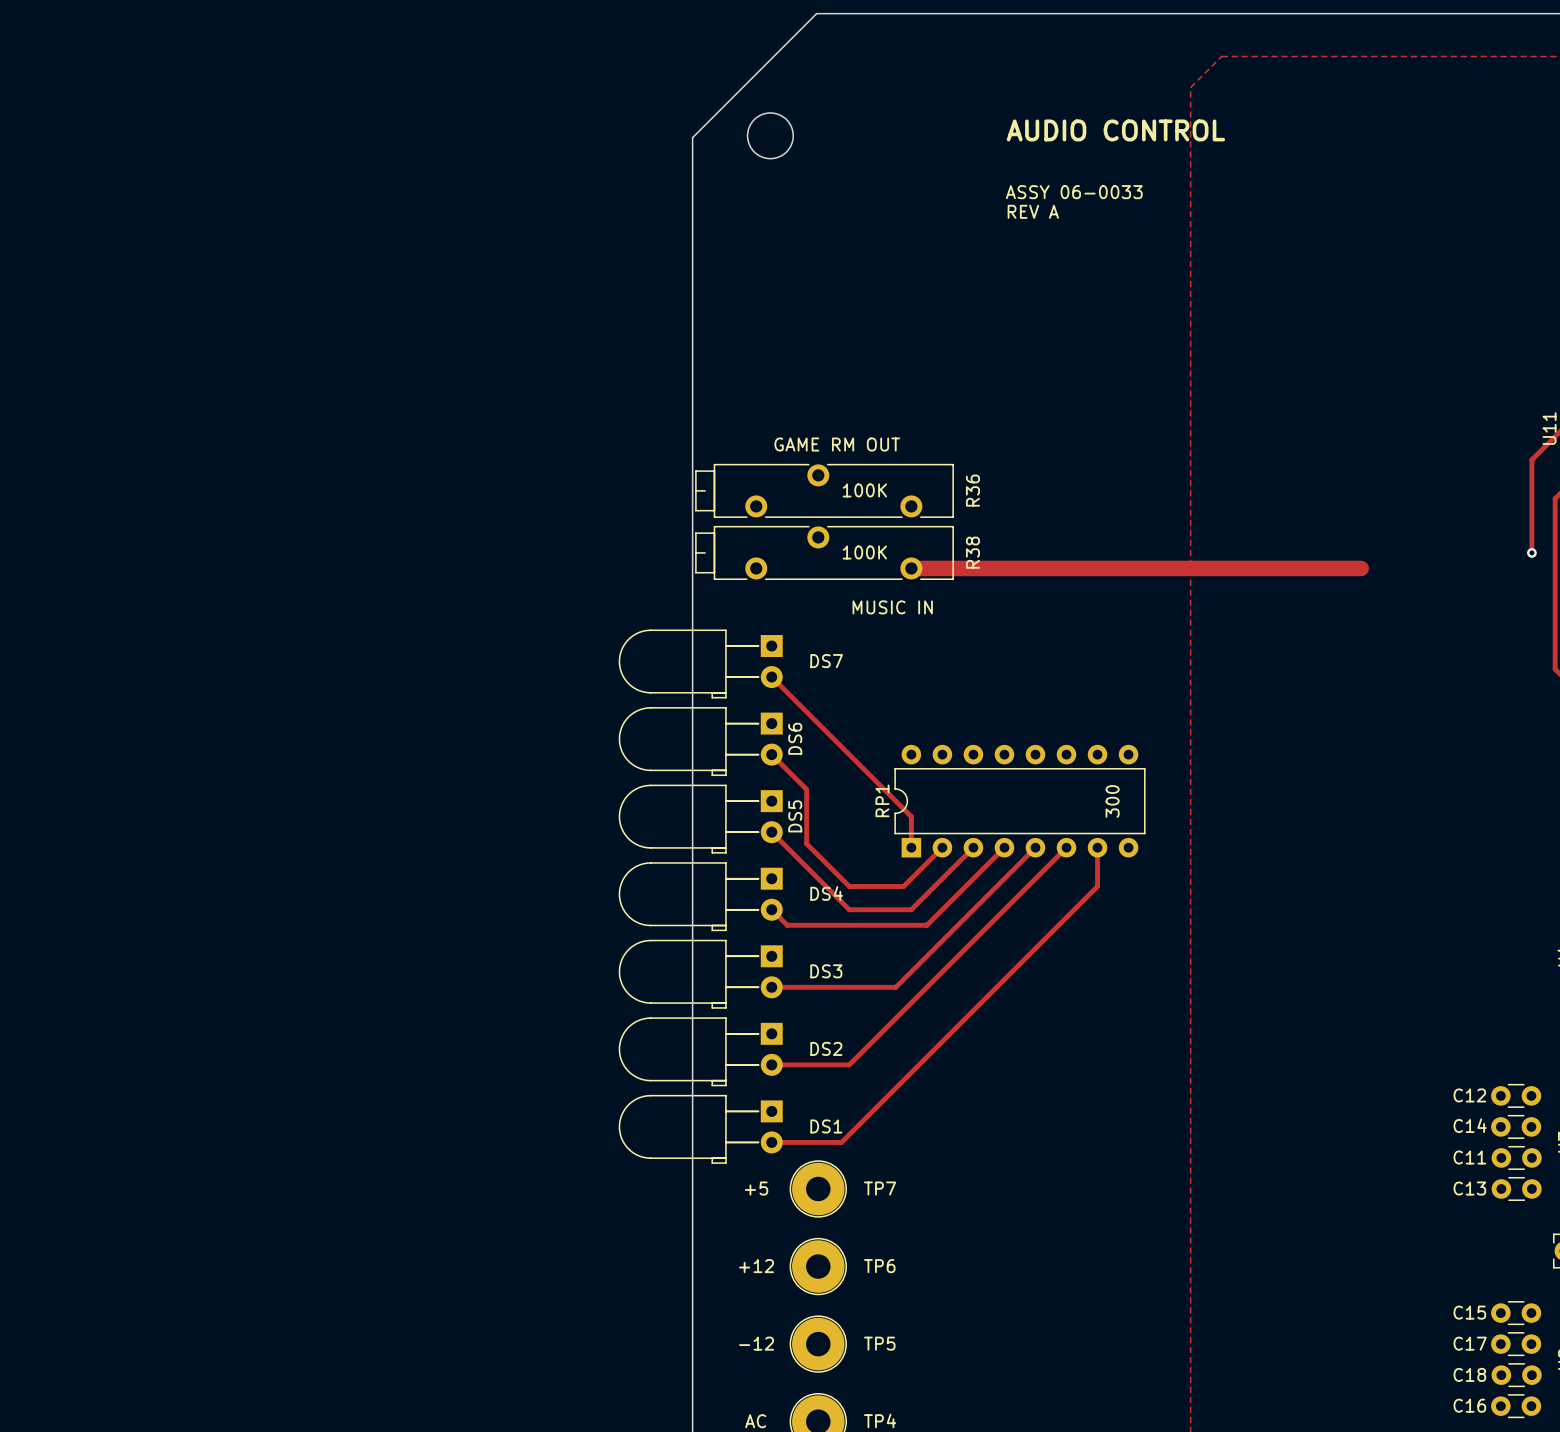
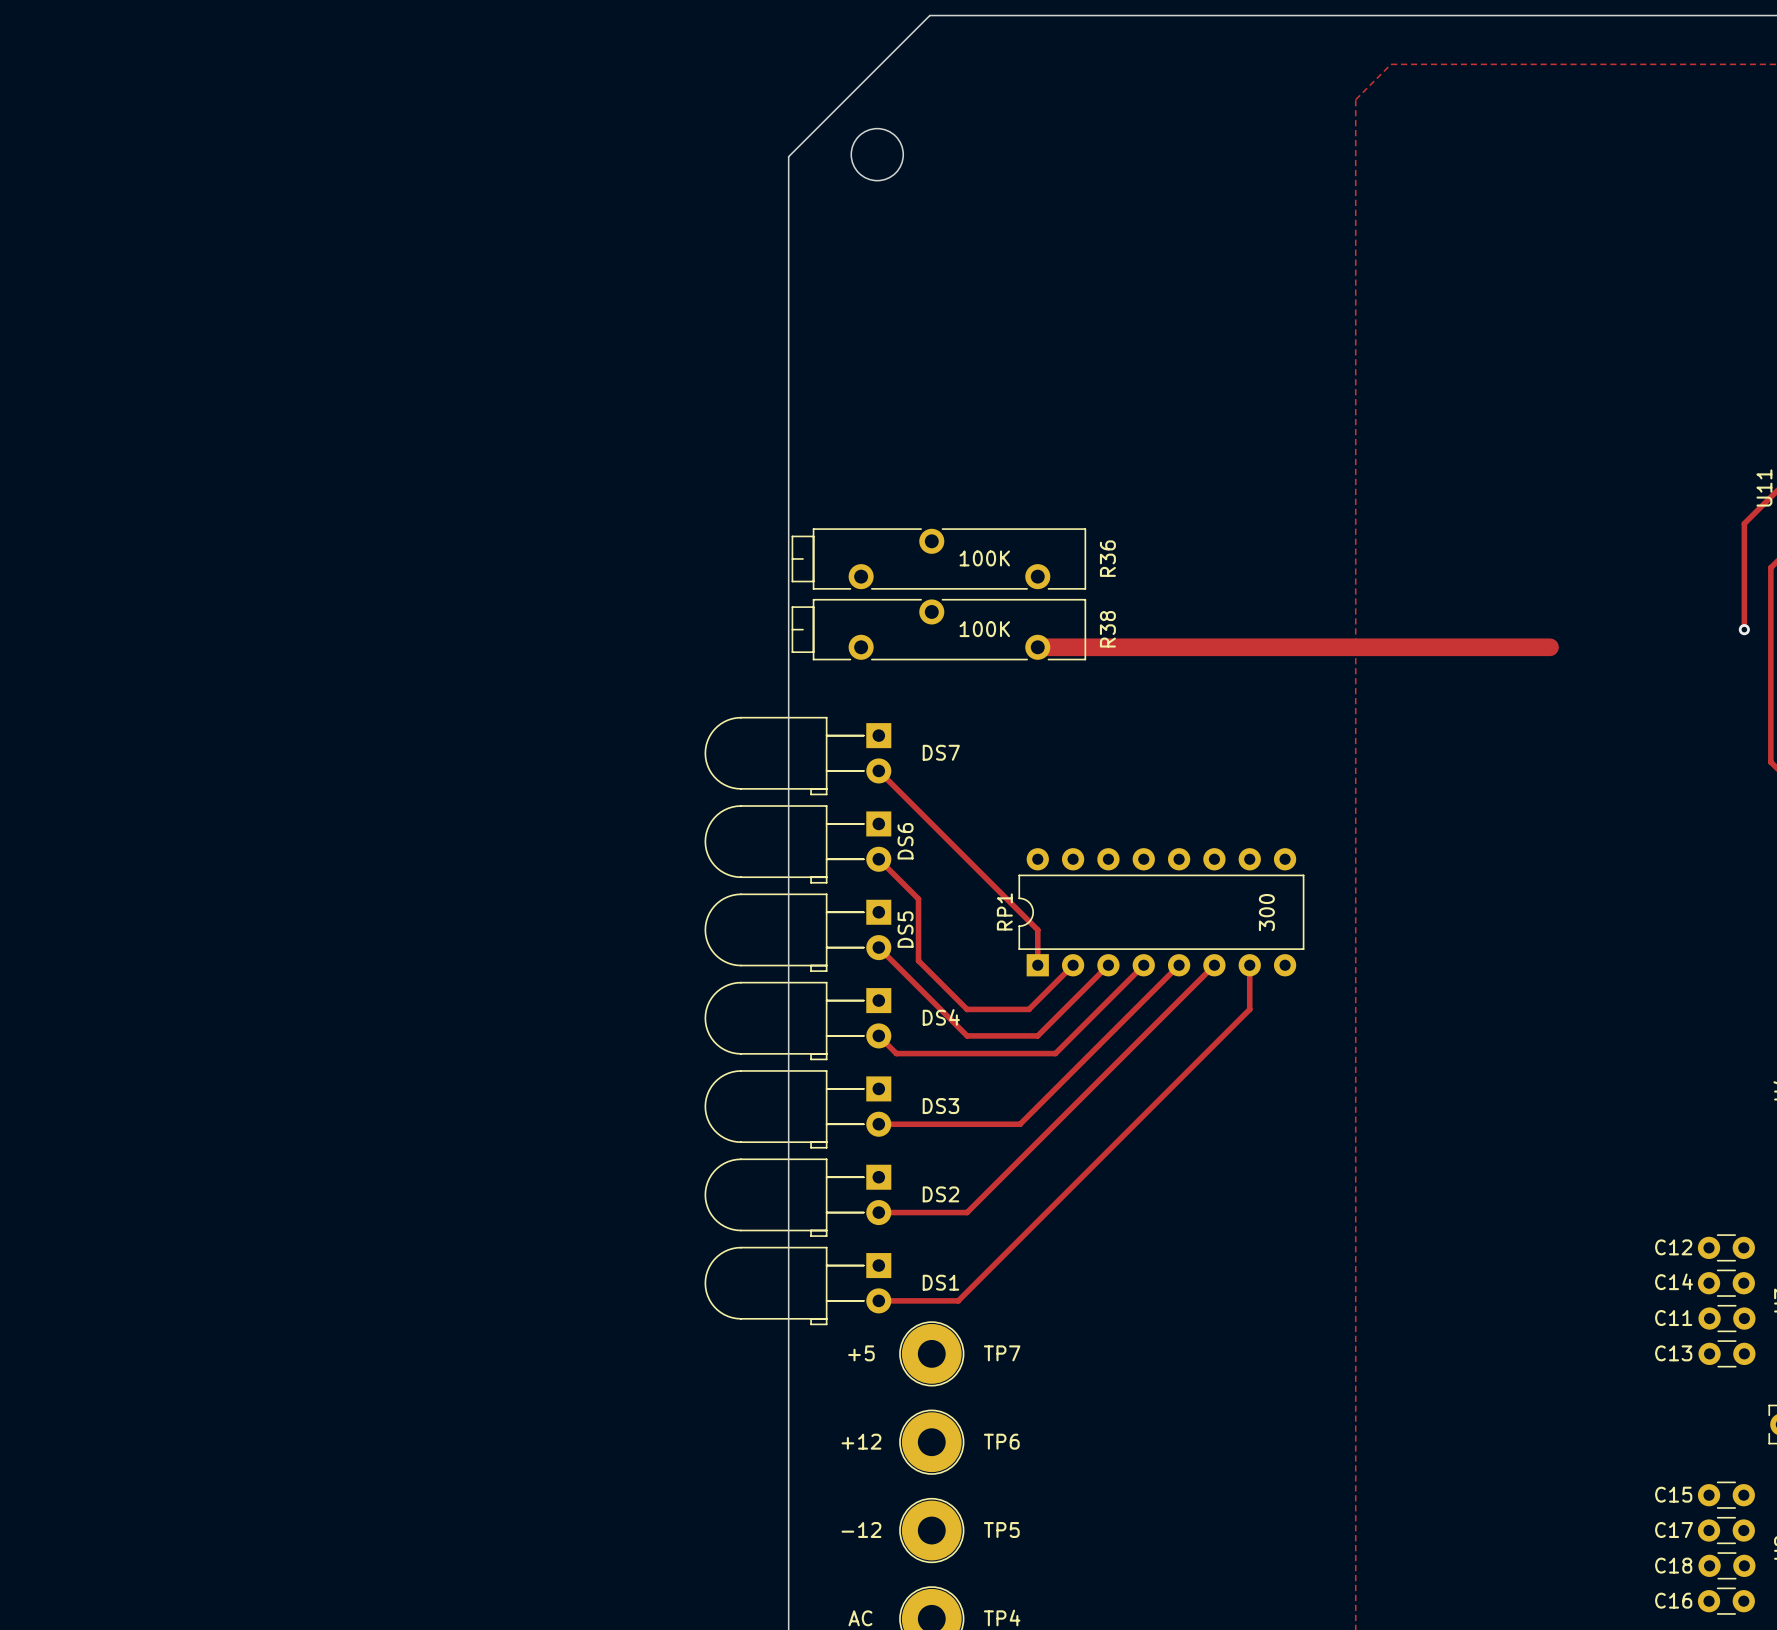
text: AUDIO CONTROL (1115, 130) -> none
text: ASSY 06-0033 (1074, 192) -> none
text: REV A (1033, 211) -> none
text: GAME RM OUT (837, 444) -> none
text: MUSIC IN (892, 607) -> none

